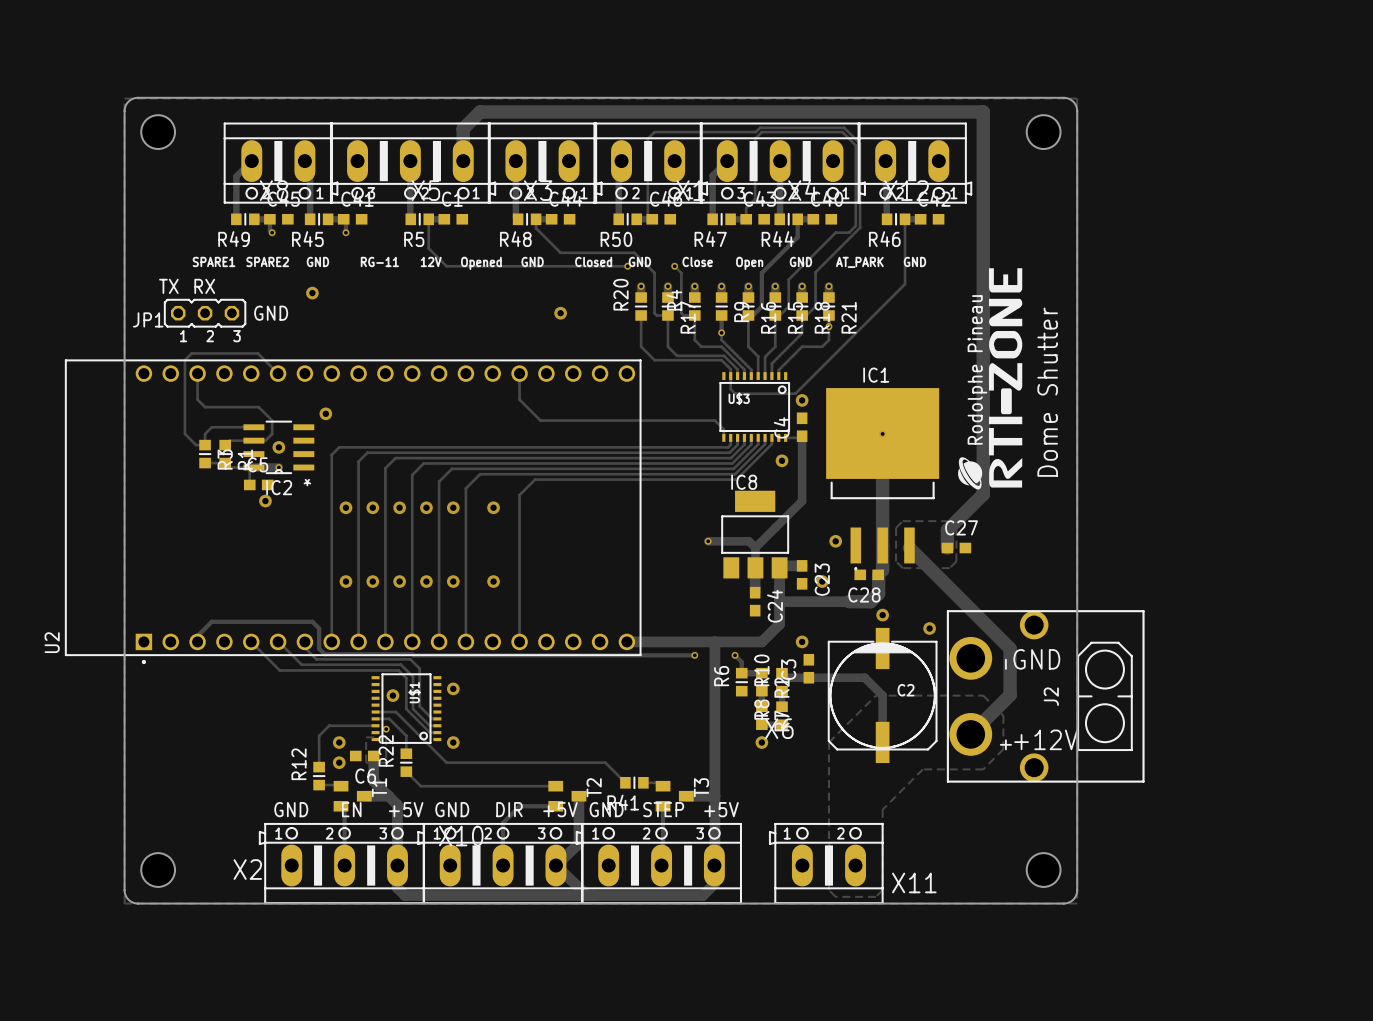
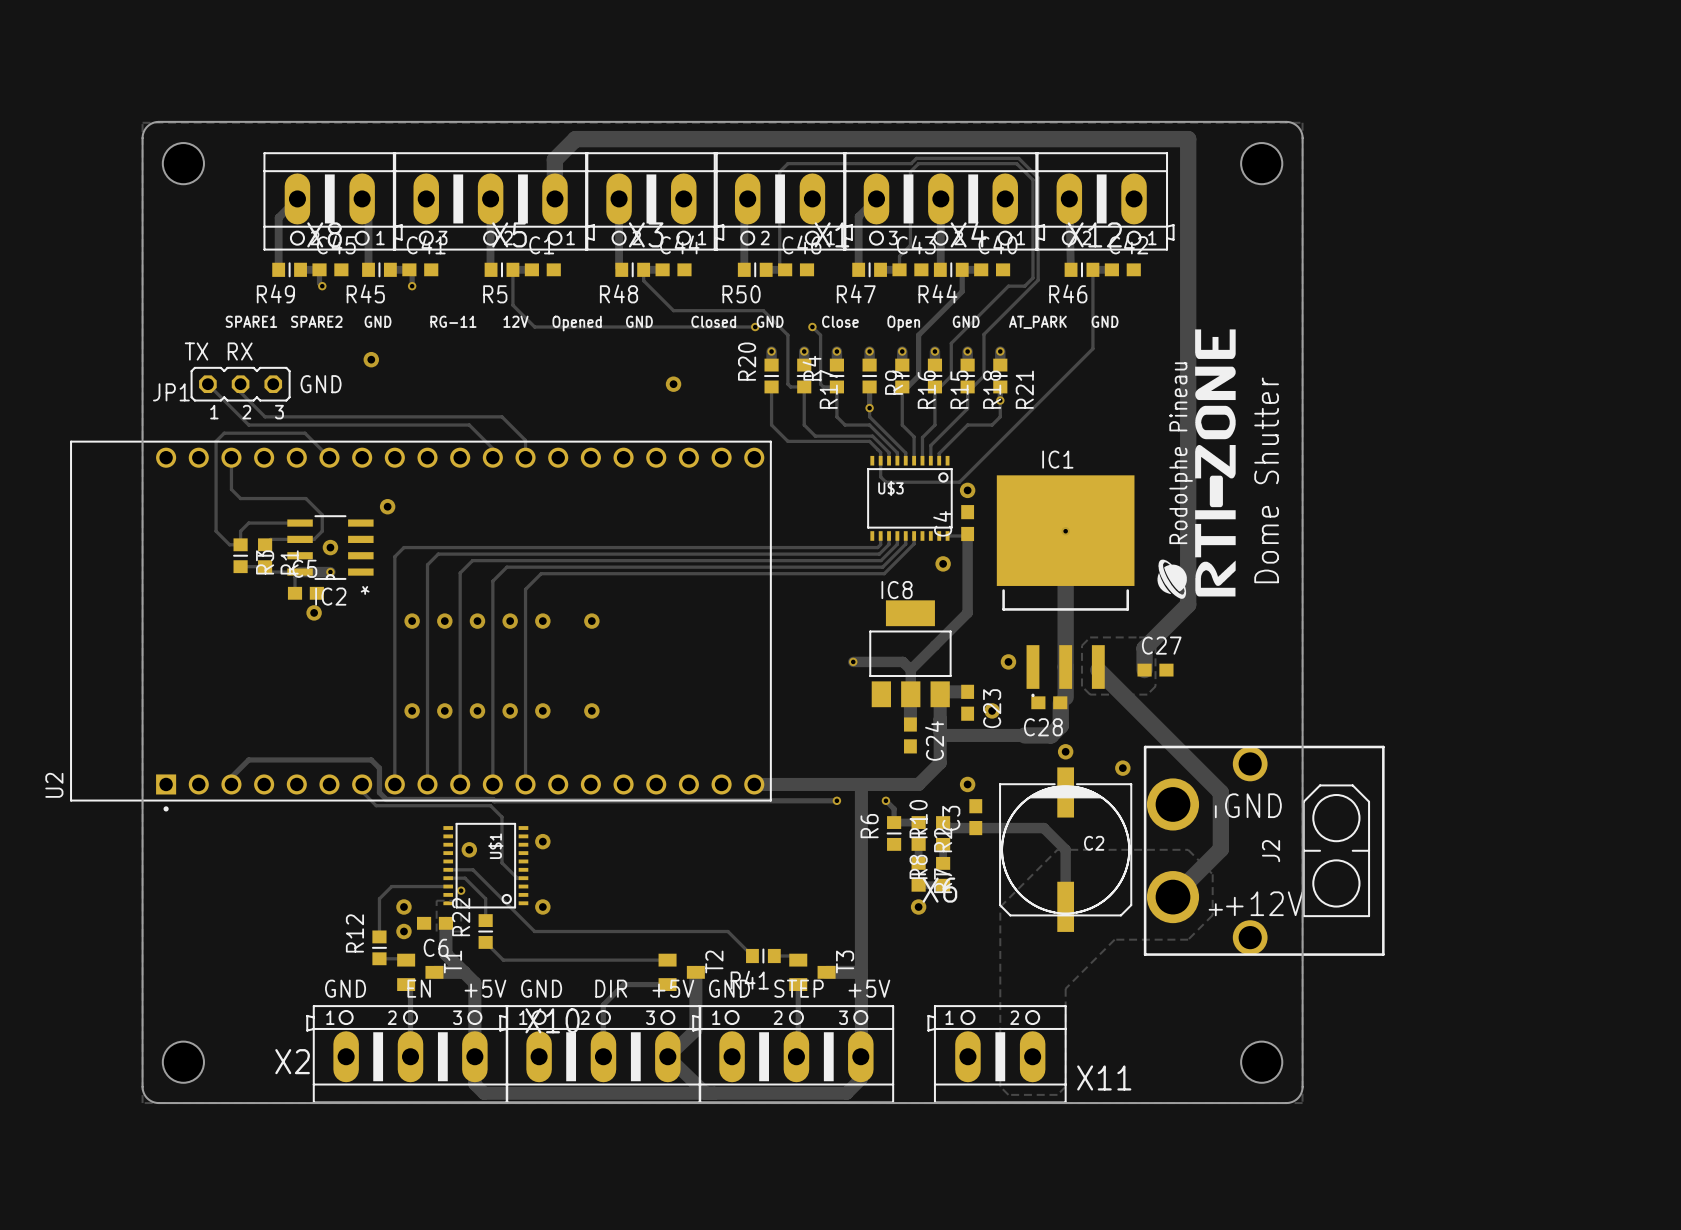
track: none -> (207, 384) (248, 425) (469, 425) (492, 448) (492, 457)
track: none -> (240, 384) (240, 392) (265, 416) (501, 416) (525, 440) (525, 457)
track: (519, 373) (519, 399) (540, 420) (714, 420) (723, 429) (723, 437) -> none
track: (765, 437) (765, 444) (735, 474) (480, 474) (465, 488) (465, 641) -> none
track: (771, 437) (771, 444) (736, 479) (535, 479) (519, 495) (519, 641) -> none
track: (251, 641) (279, 670) (398, 670) (406, 678) (406, 709) (429, 732) (437, 732) -> none
track: (278, 641) (301, 664) (400, 664) (413, 676) (413, 709) (429, 725) (437, 725) -> none

